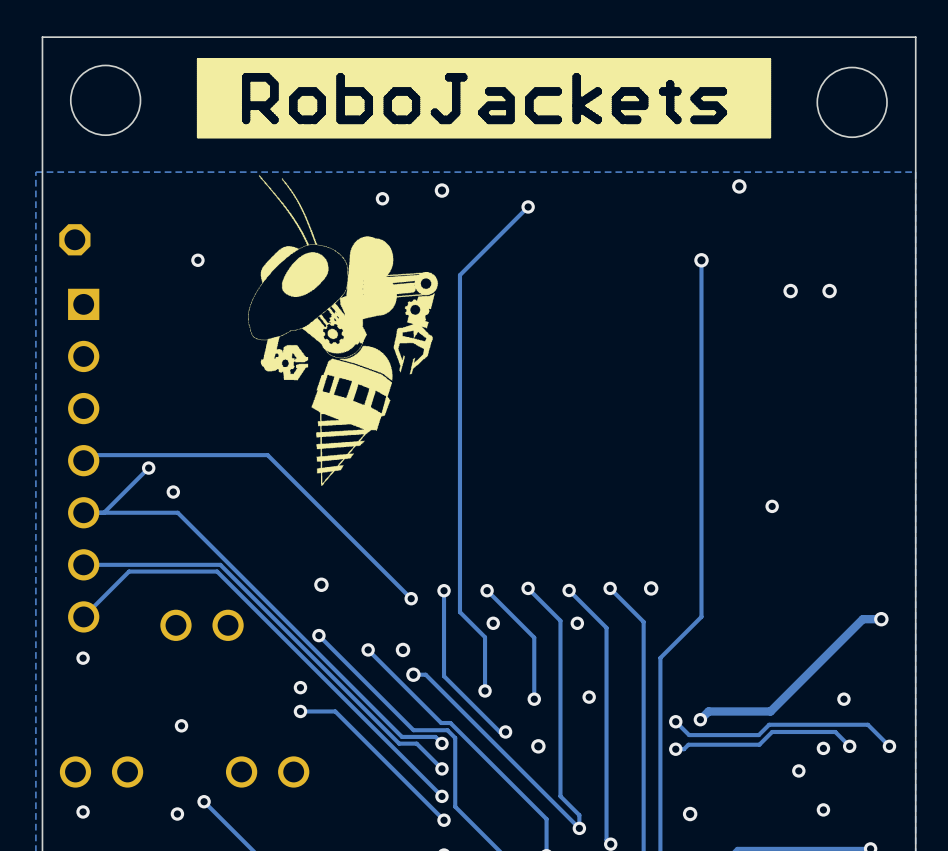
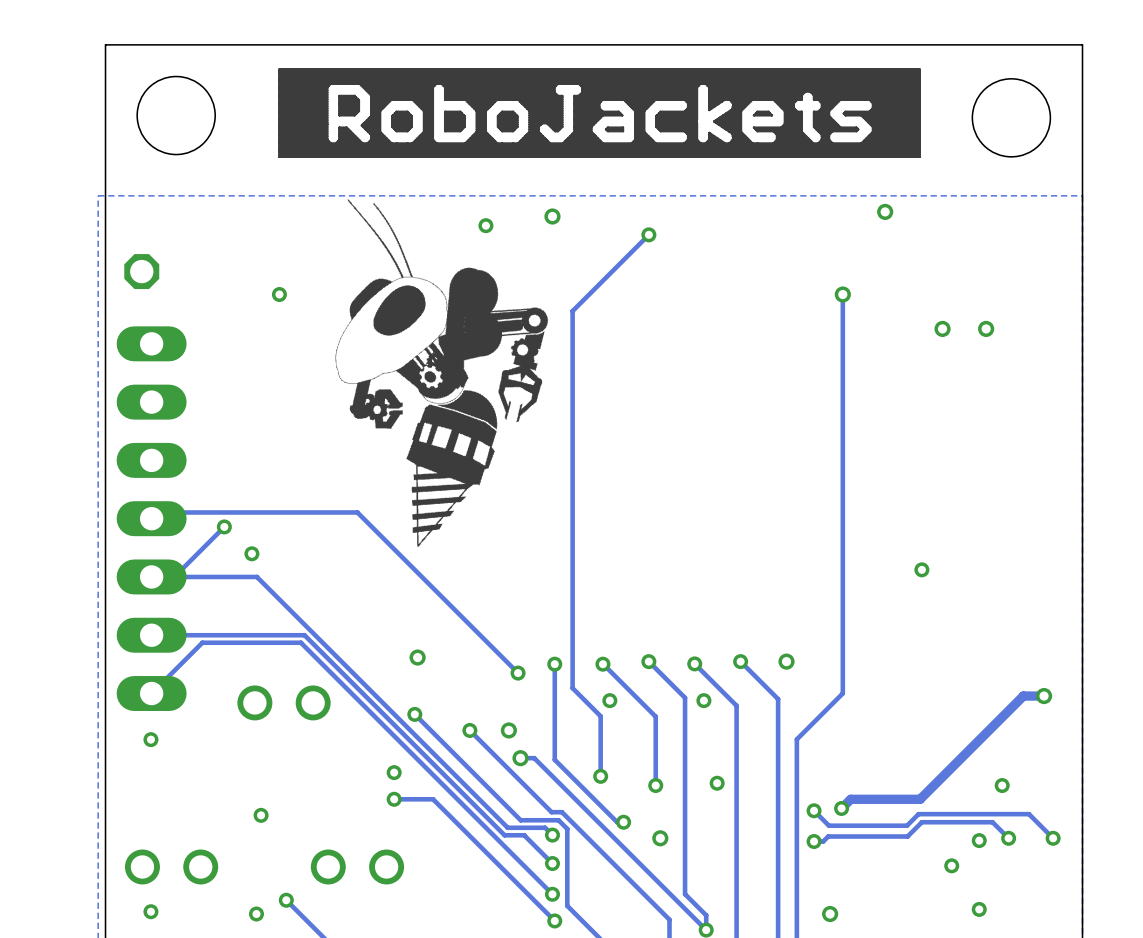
part footprint: [68, 288, 100, 633] -> [116, 326, 187, 712]

